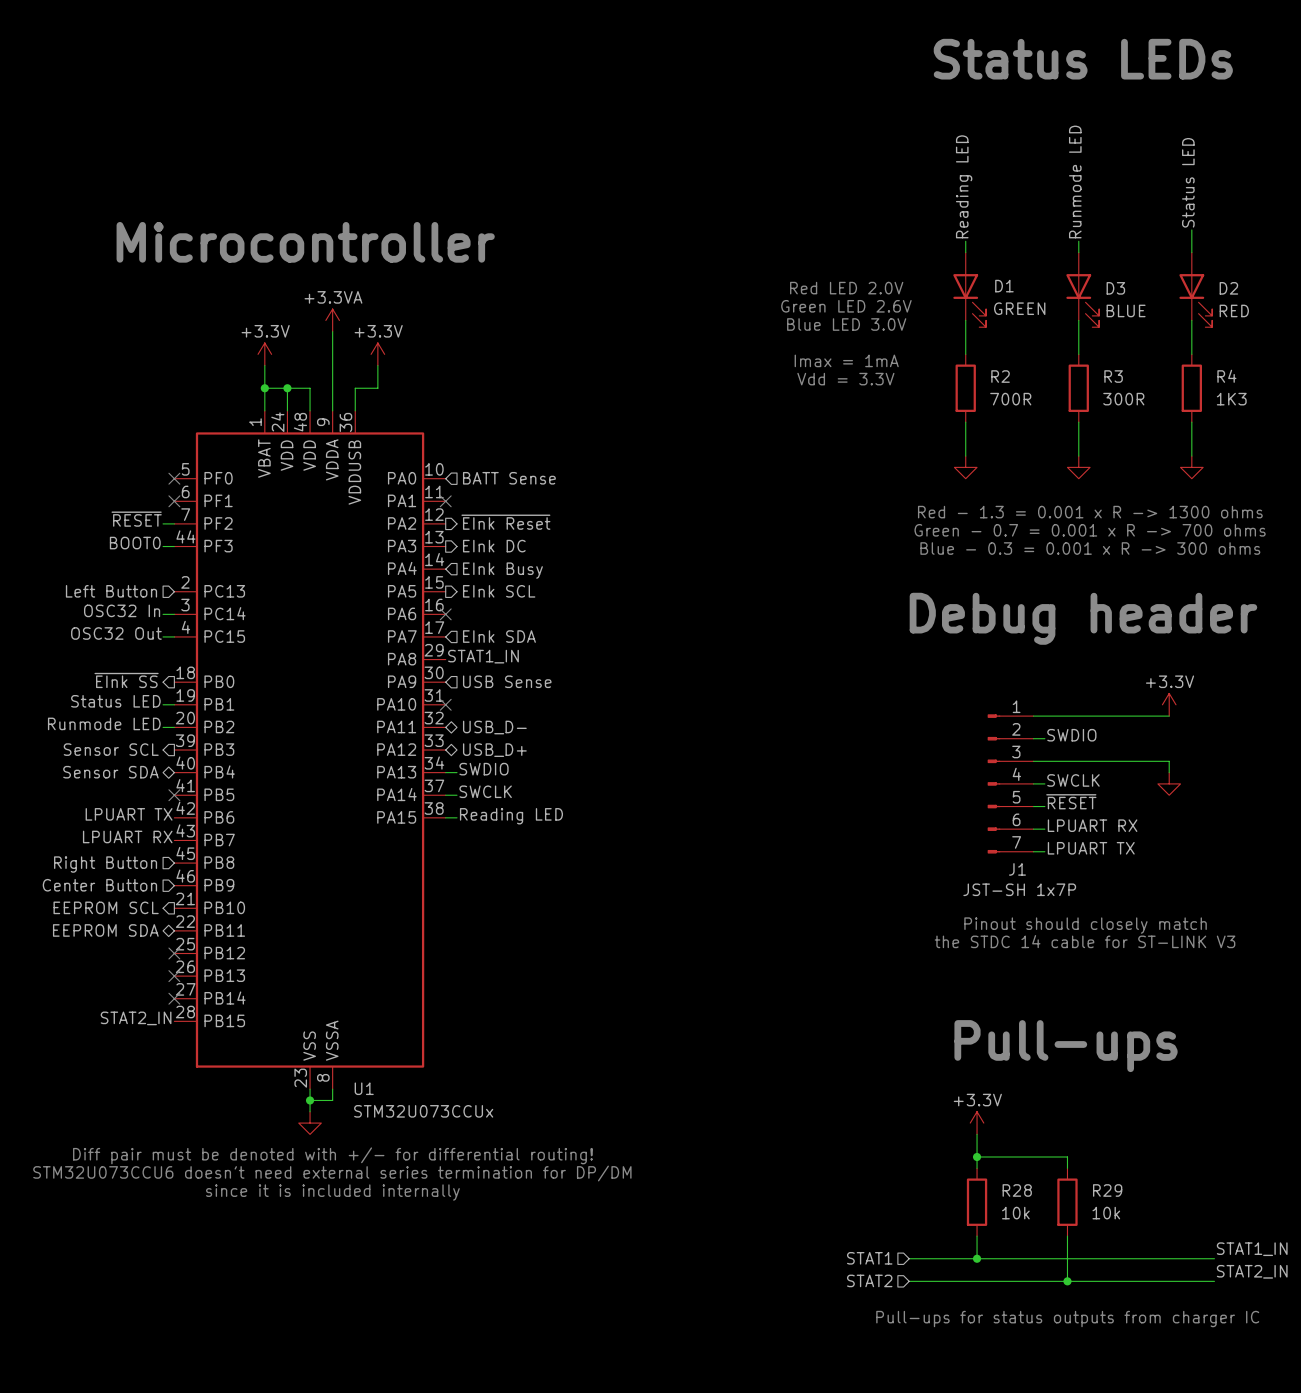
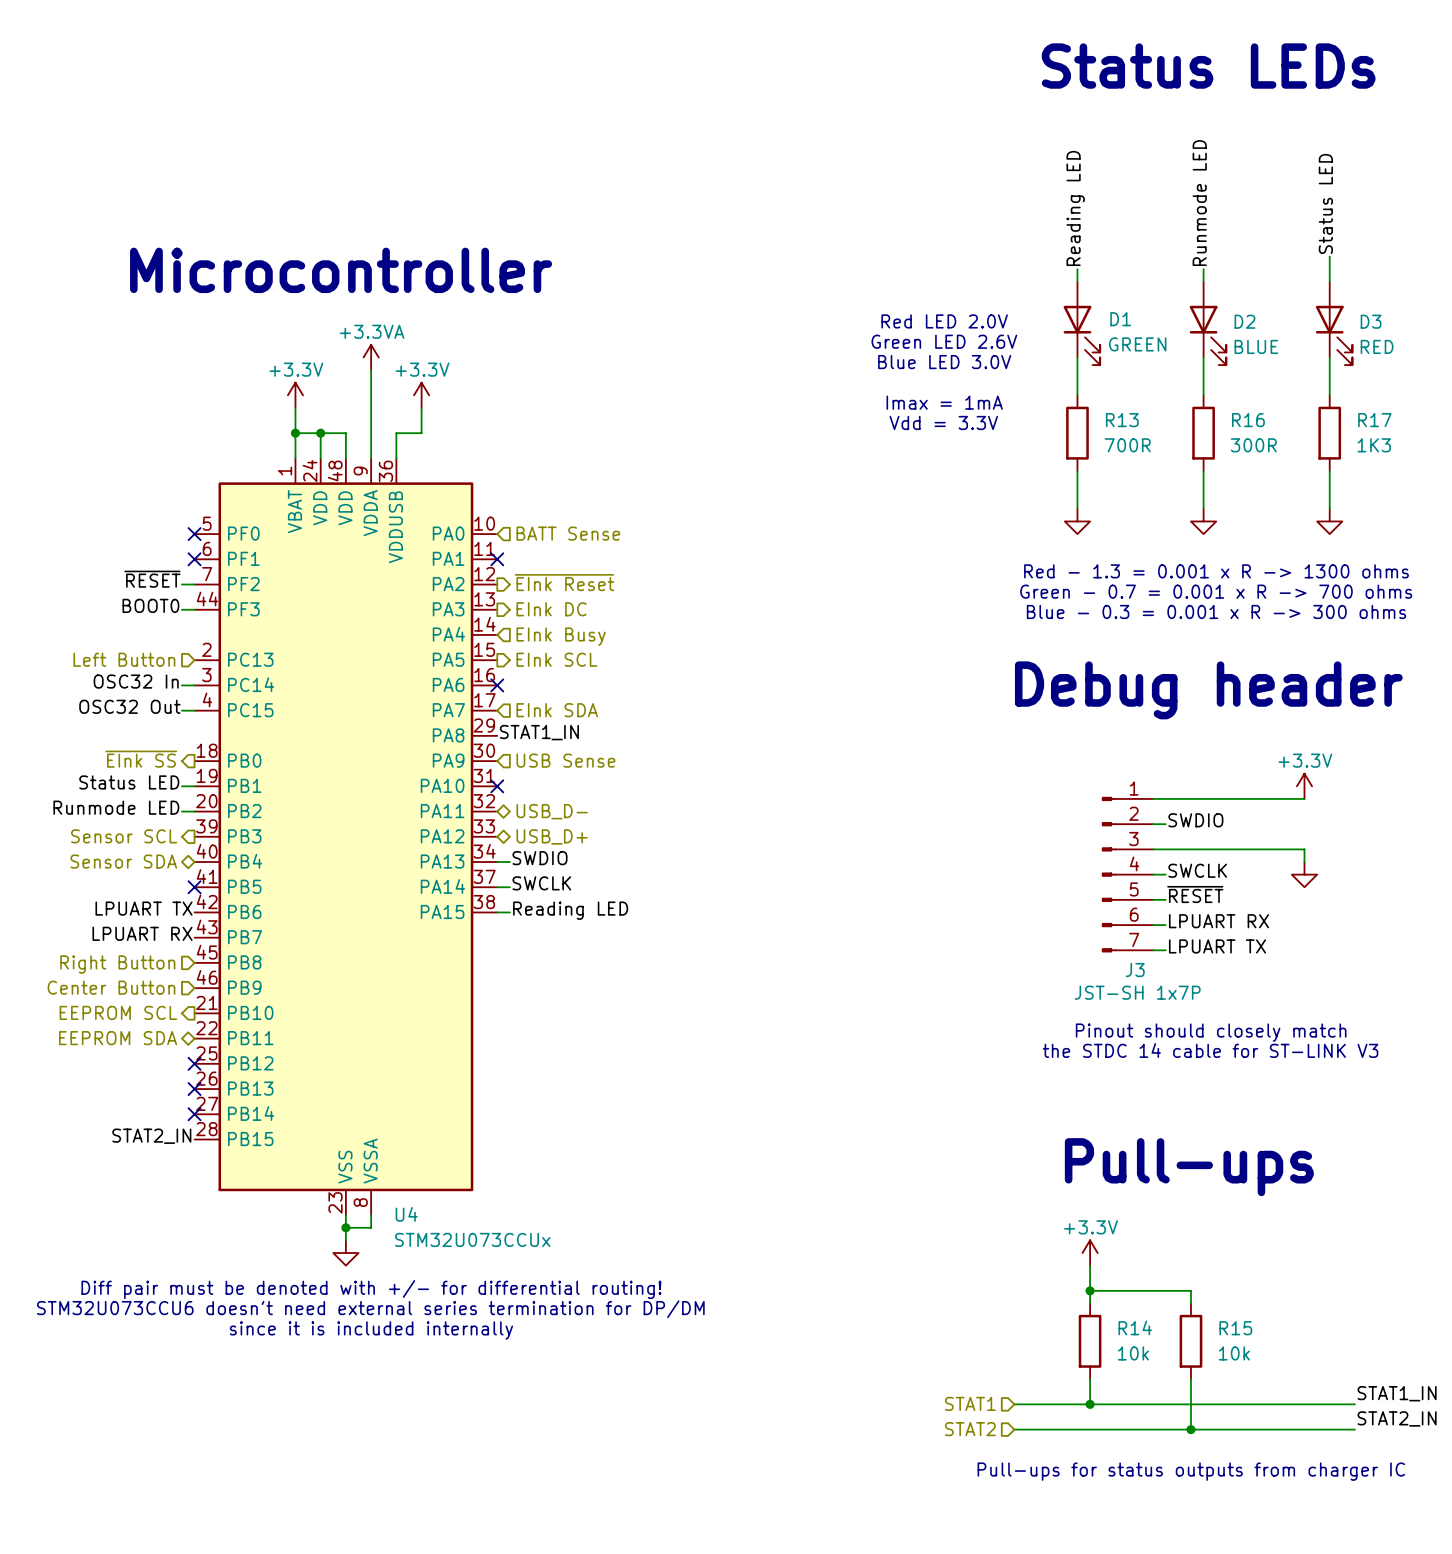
D3 name: D3 (1115, 288) -> D2 (1244, 321)
D2 name: D2 (1228, 288) -> D3 (1371, 321)
R2 name: R2 (1000, 376) -> R13 (1122, 420)
R3 name: R3 (1113, 376) -> R16 (1248, 420)
R4 name: R4 (1226, 376) -> R17 (1374, 420)
J1 name: J1 (1017, 869) -> J3 (1135, 970)
U1 name: U1 (364, 1088) -> U4 (406, 1214)
R28 name: R28 (1017, 1190) -> R14 (1135, 1327)
R29 name: R29 (1107, 1190) -> R15 (1235, 1328)

